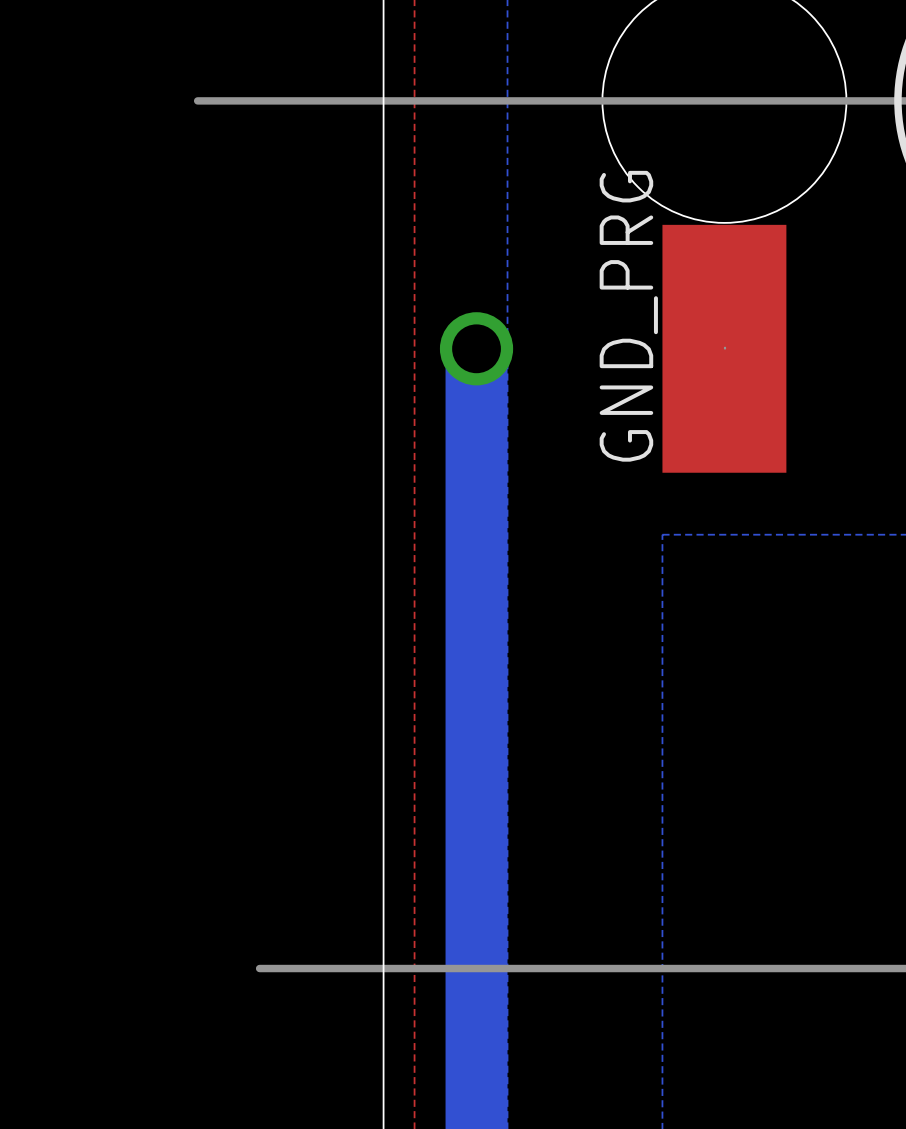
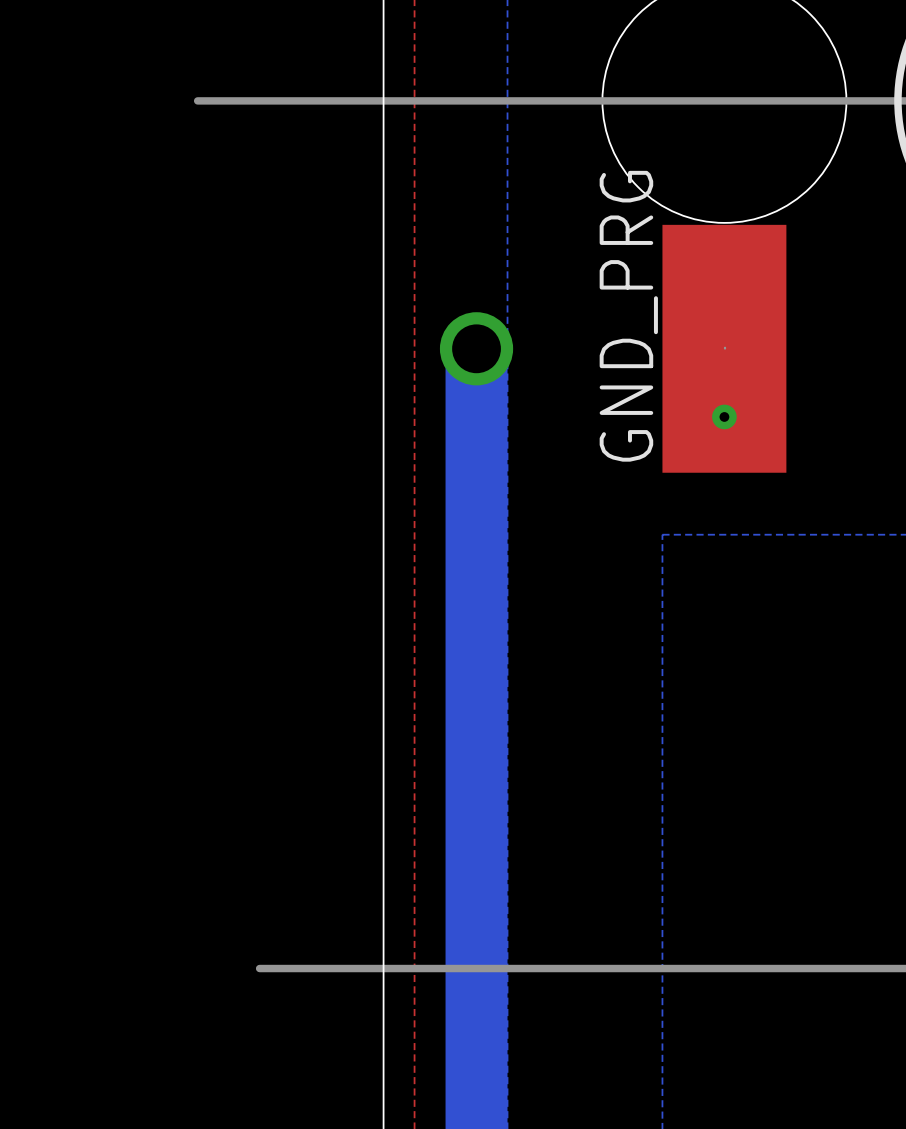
via: none -> (724, 416)

